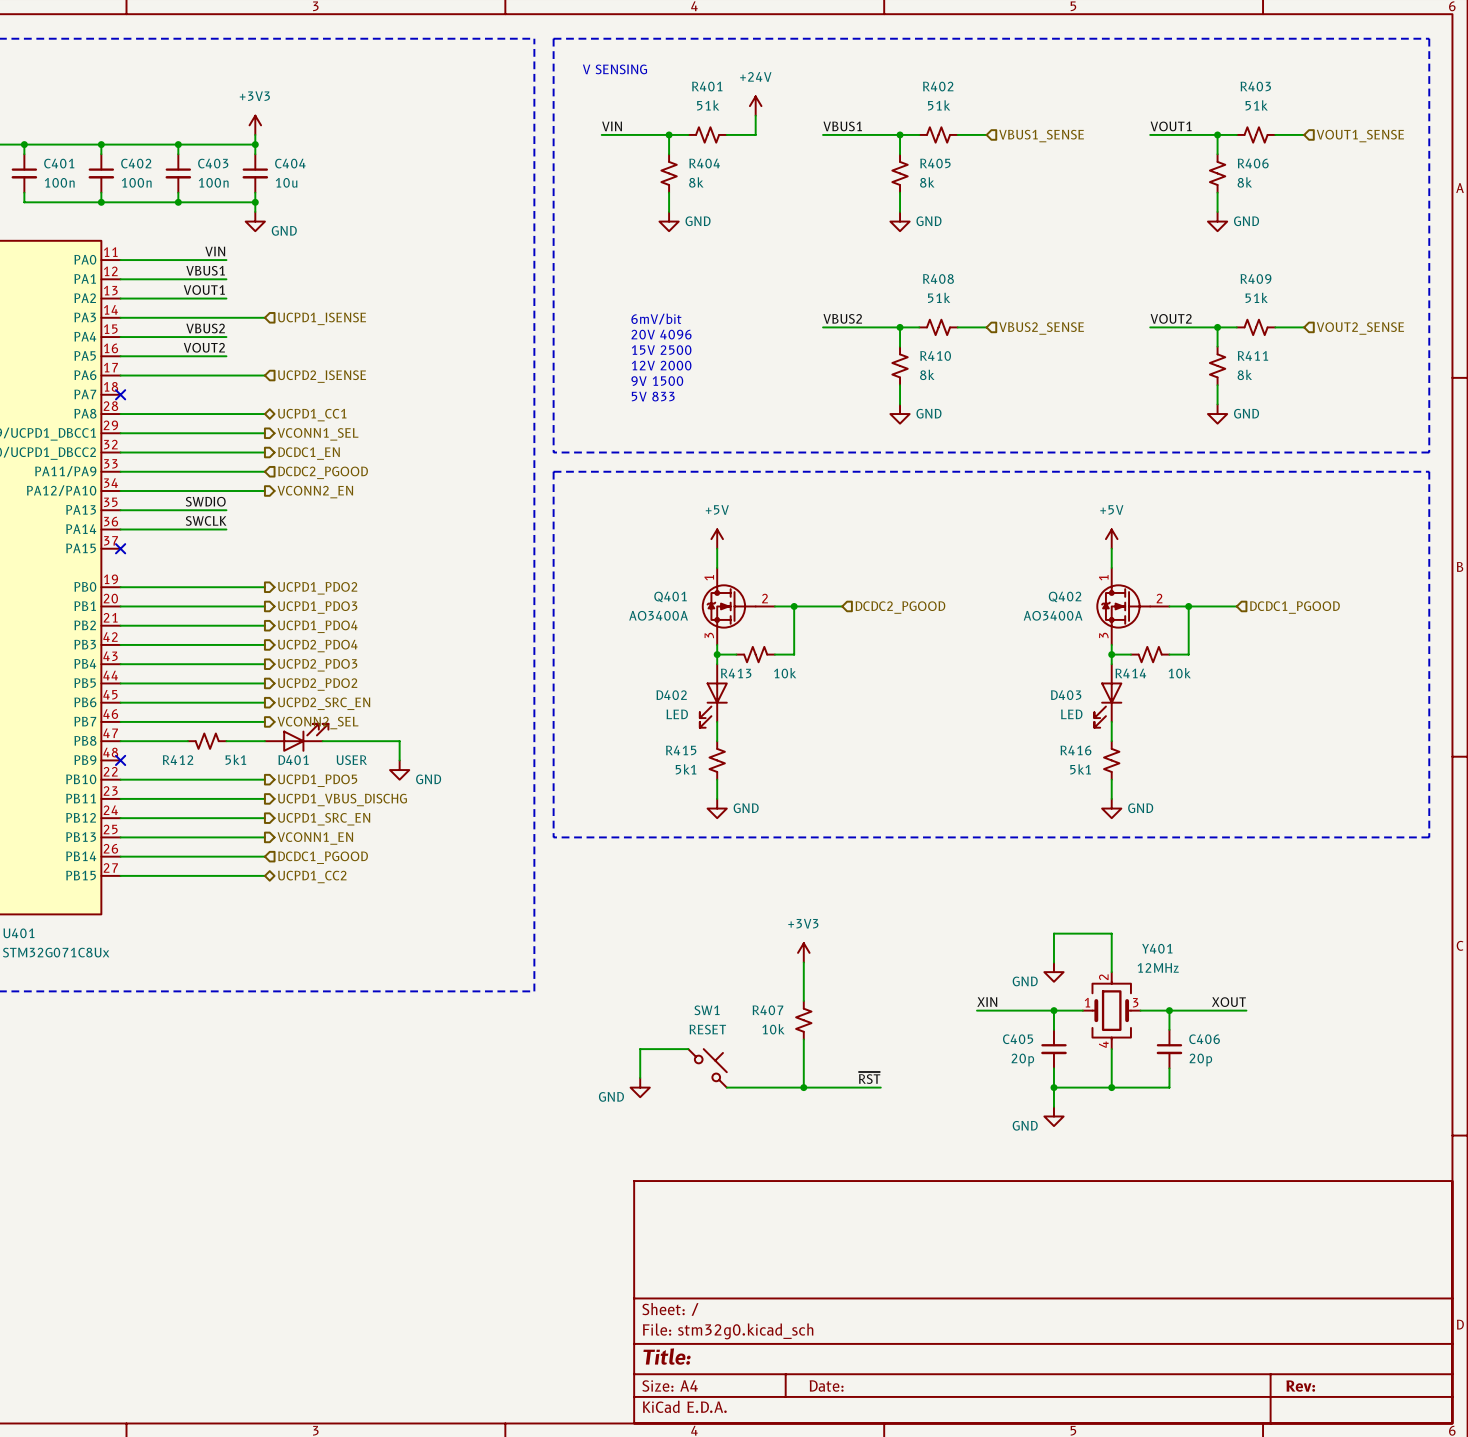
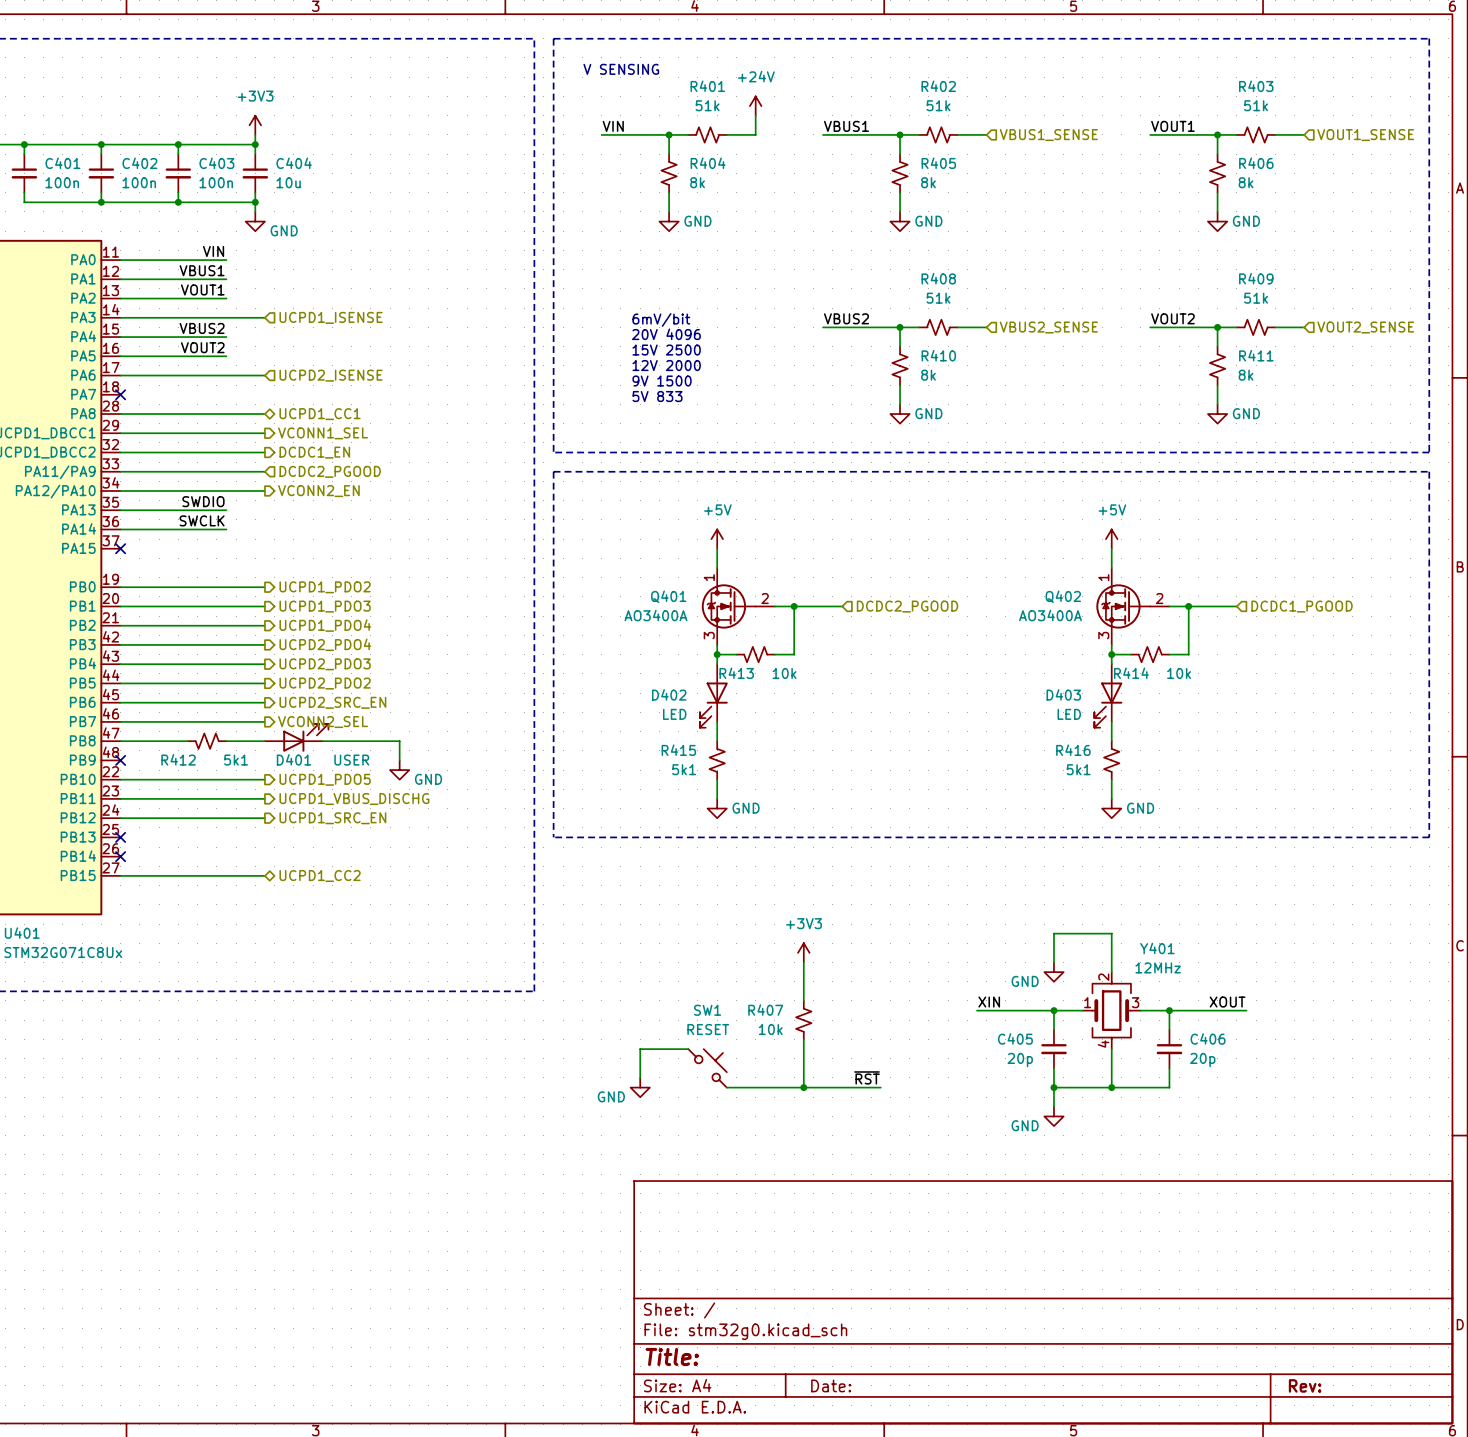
wire: (120, 837) (264, 837) -> none
no-connect mark: none -> (120, 837)
hierarchical label: VCONN1_EN (315, 838) -> none
wire: (120, 856) (264, 856) -> none
no-connect mark: none -> (120, 856)
hierarchical label: DCDC1_PGOOD (323, 857) -> none

